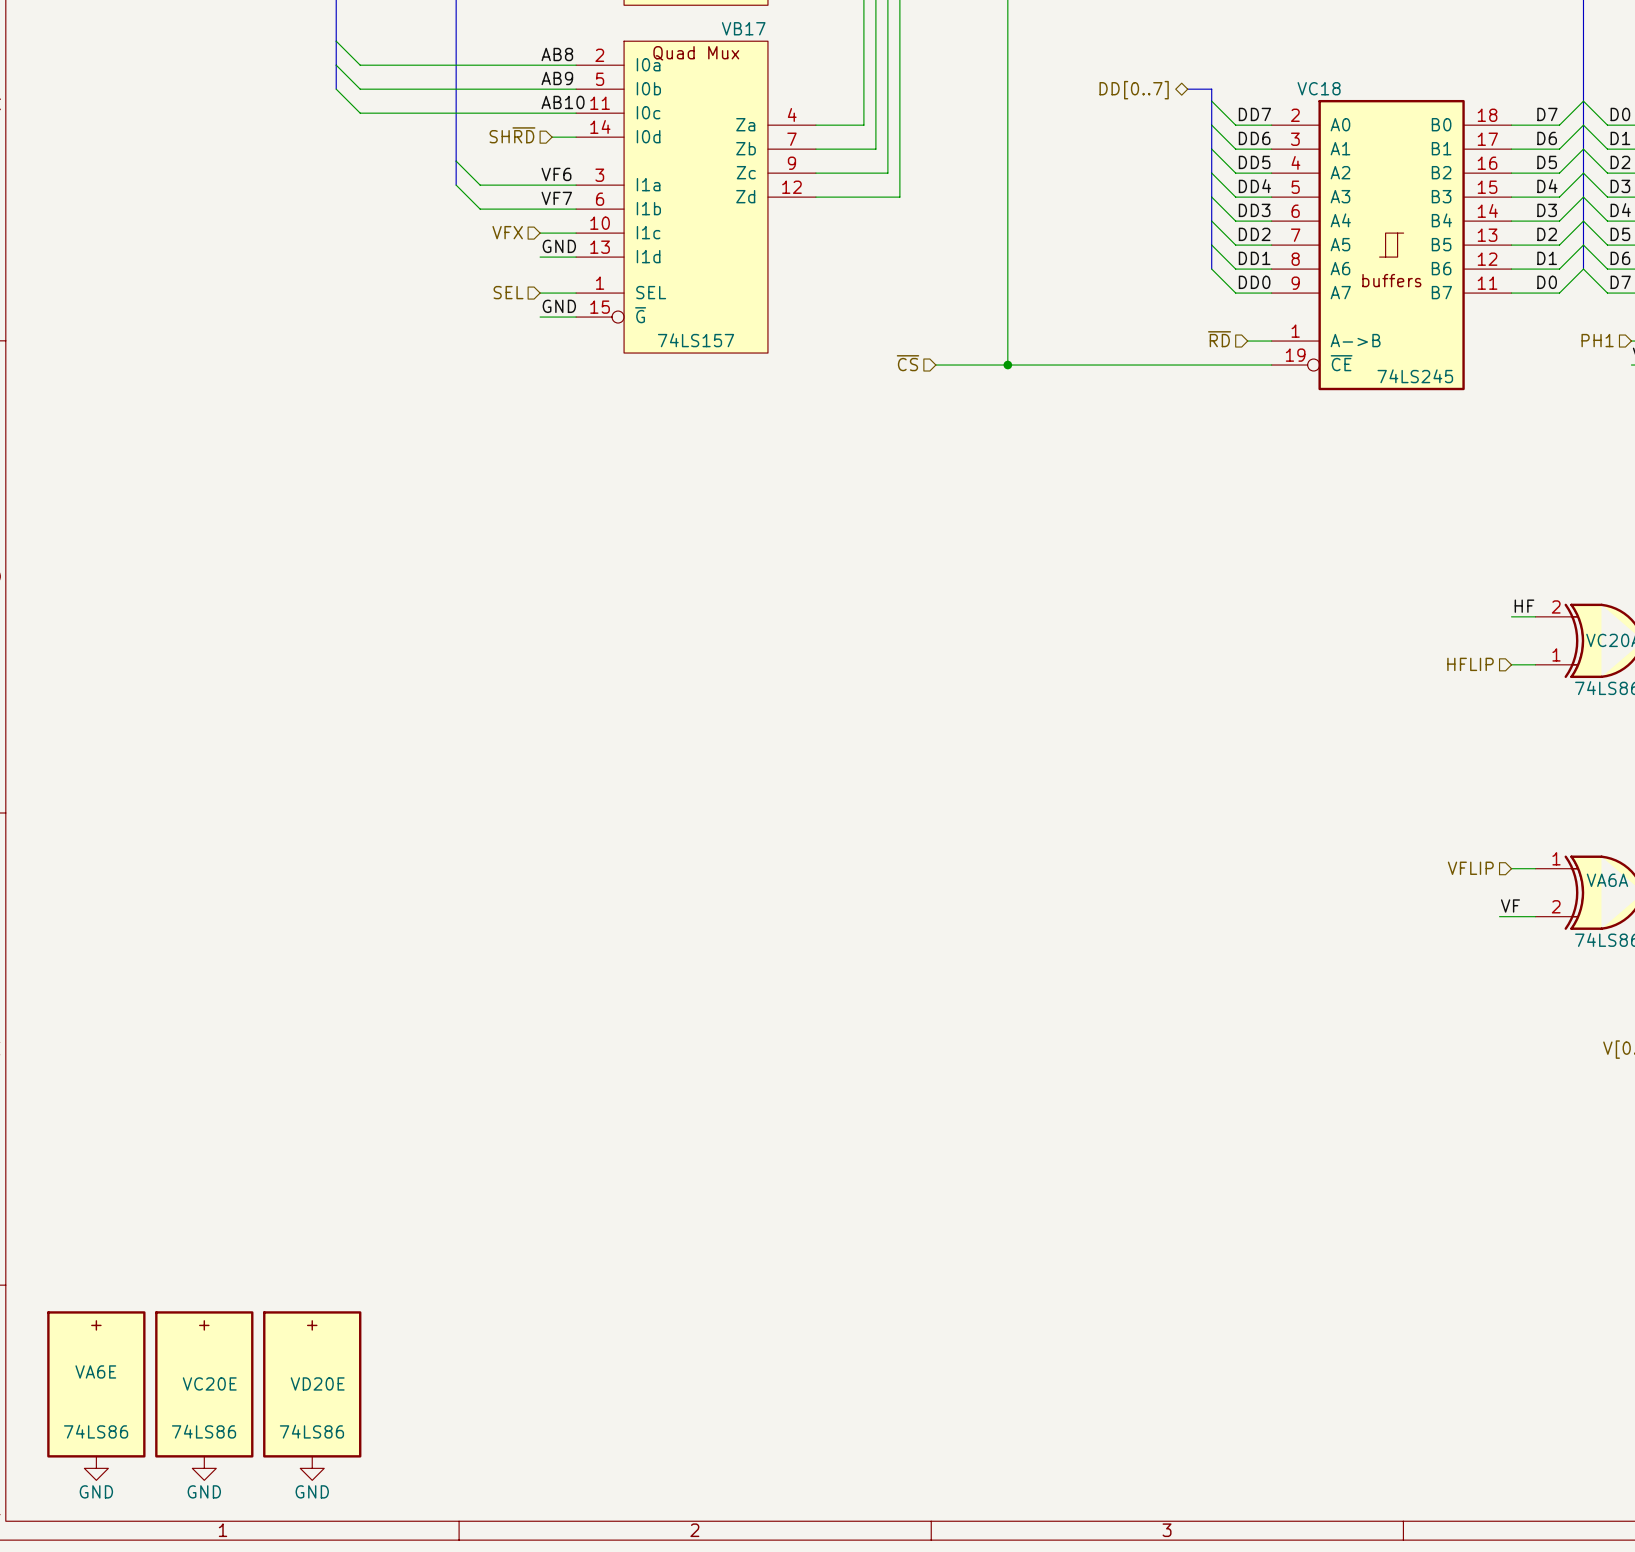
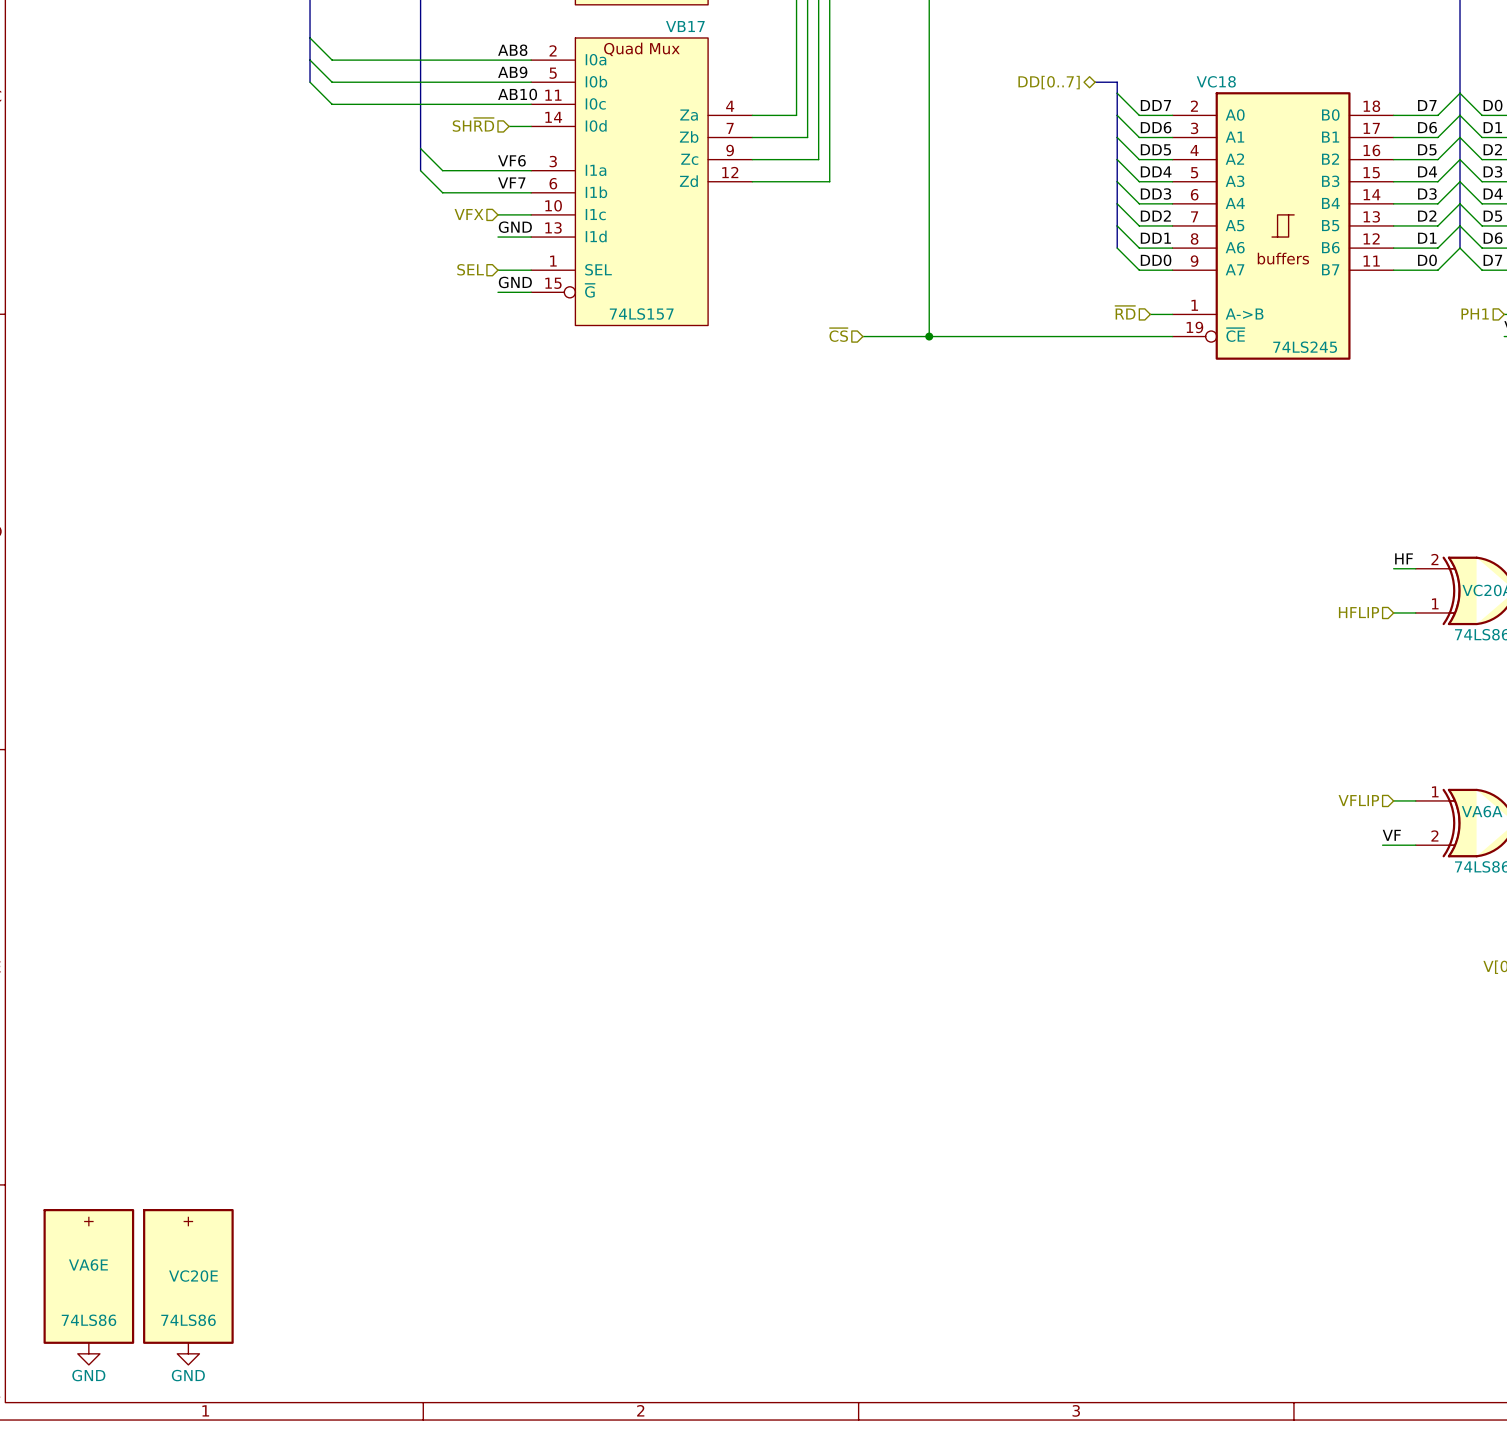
VD20E: 74LS86 (312, 1384) -> none
power symbol: GND (312, 1468) -> none

